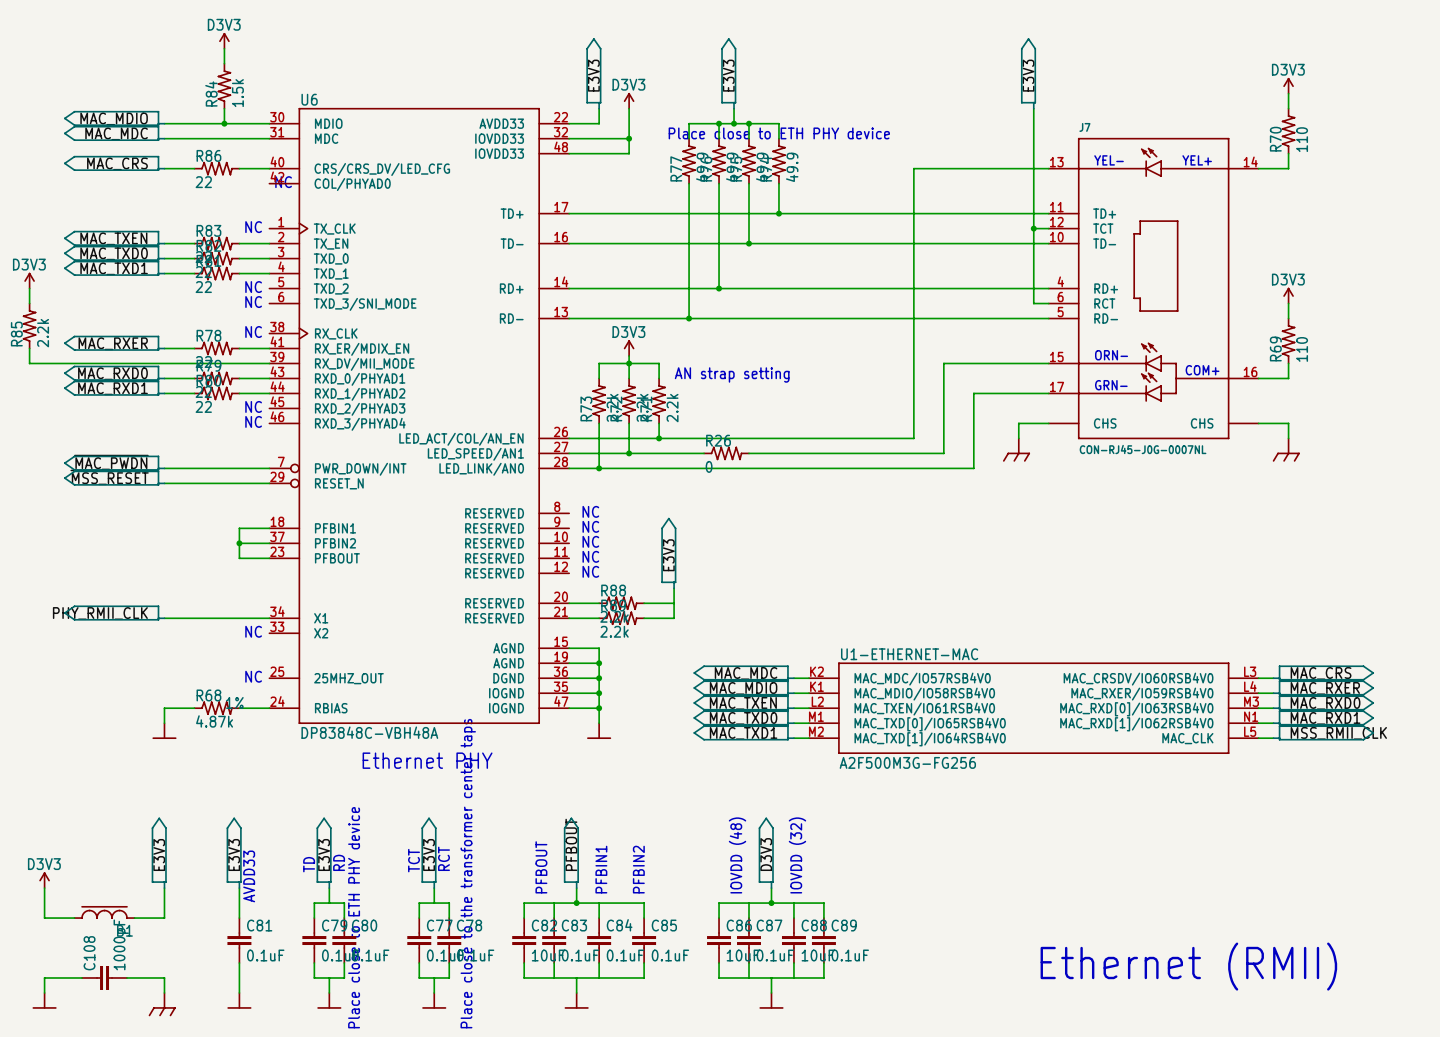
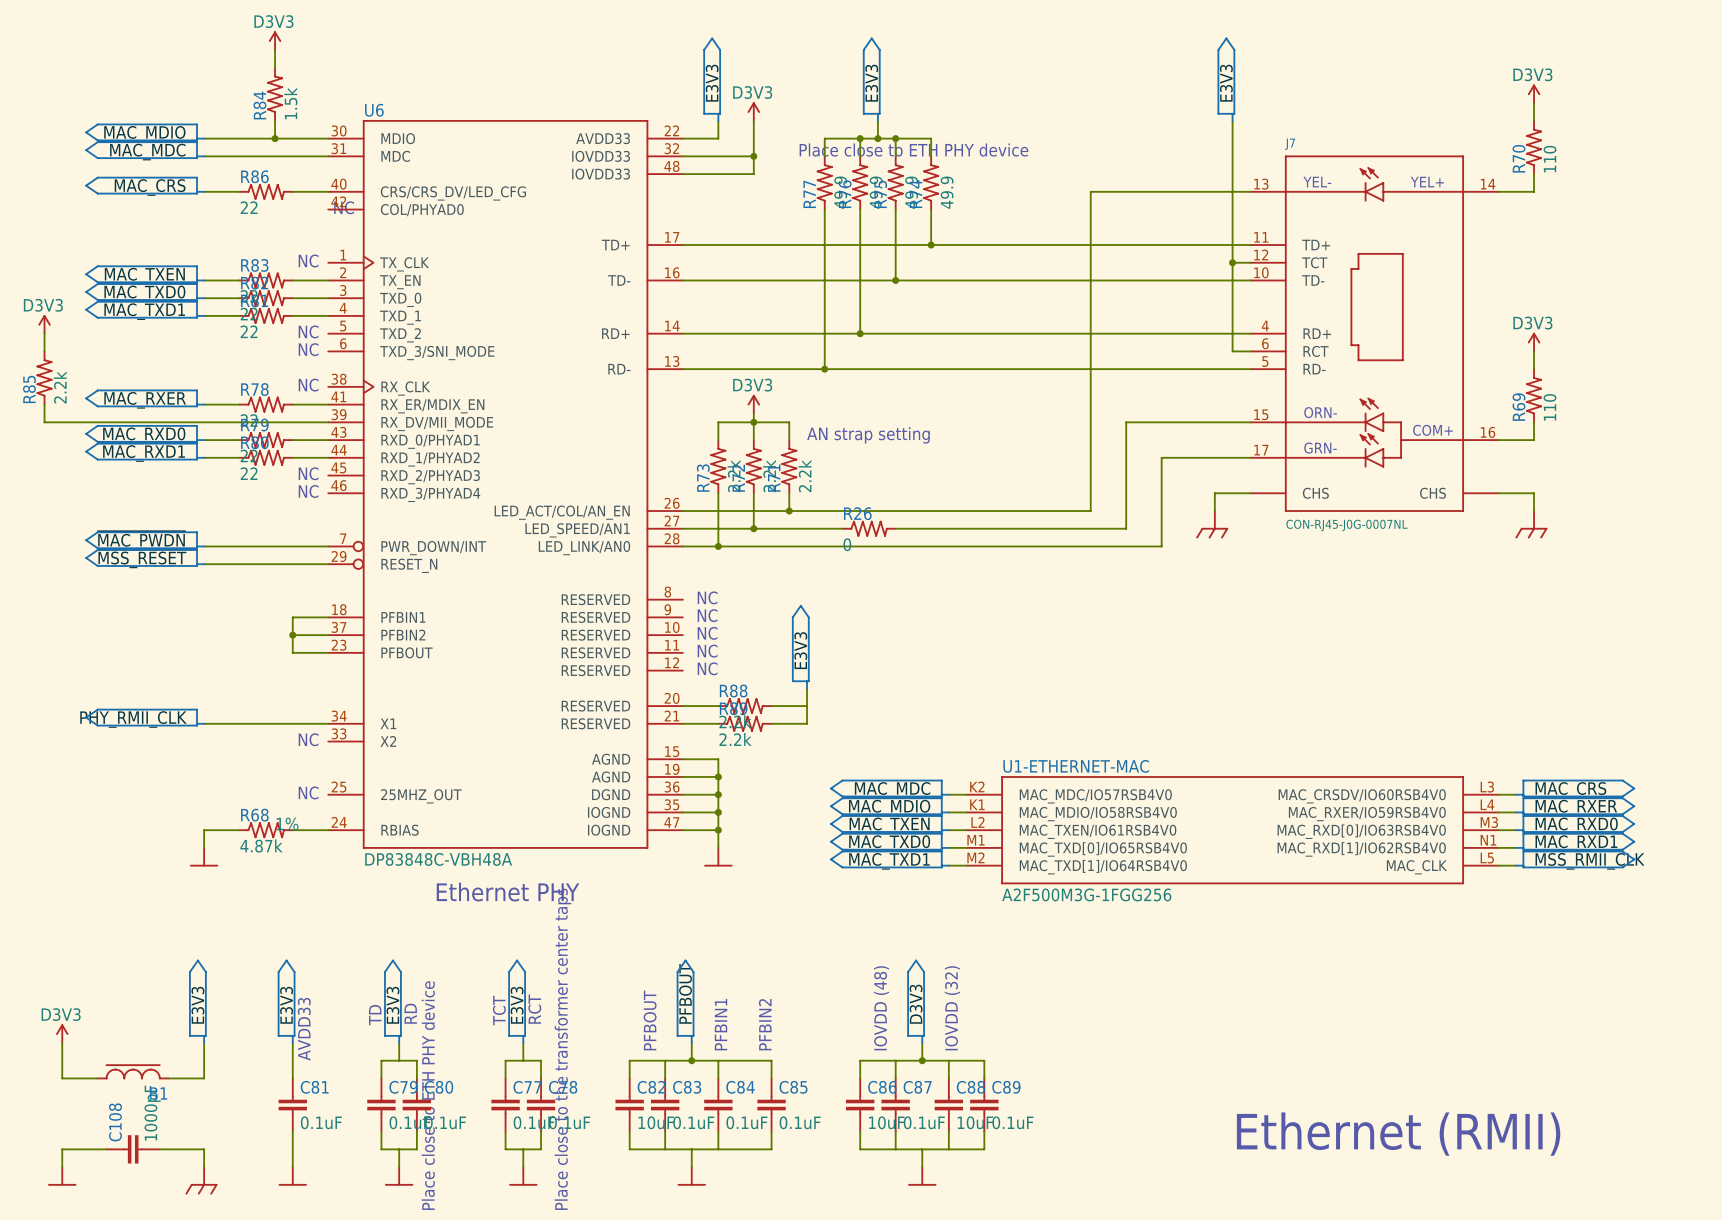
U1-ETHERNET-MAC value: A2F500M3G-FG256 (907, 762) -> A2F500M3G-1FGG256 (1086, 894)

